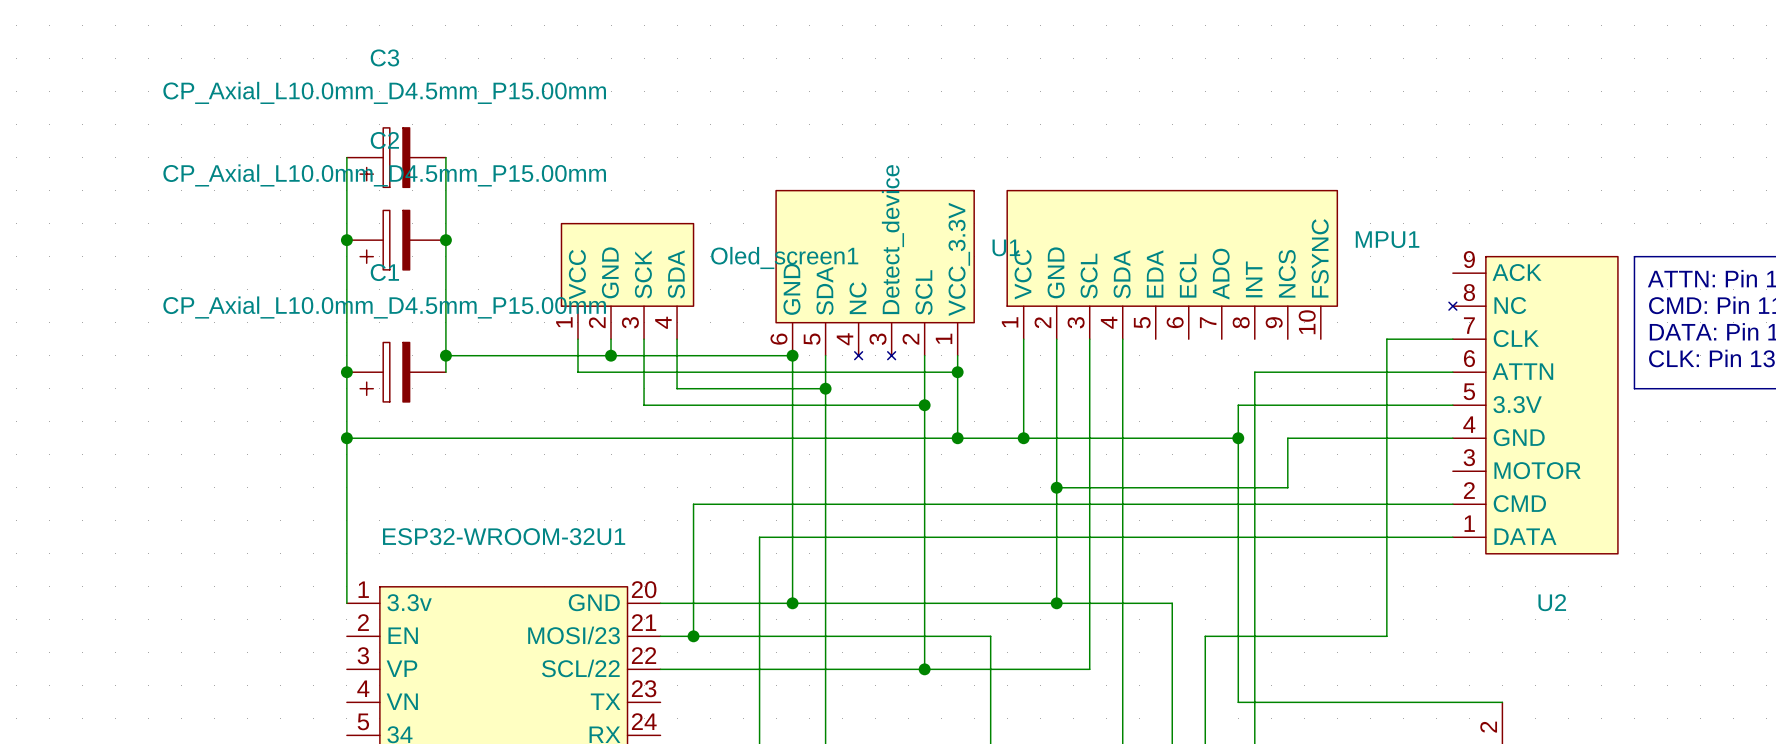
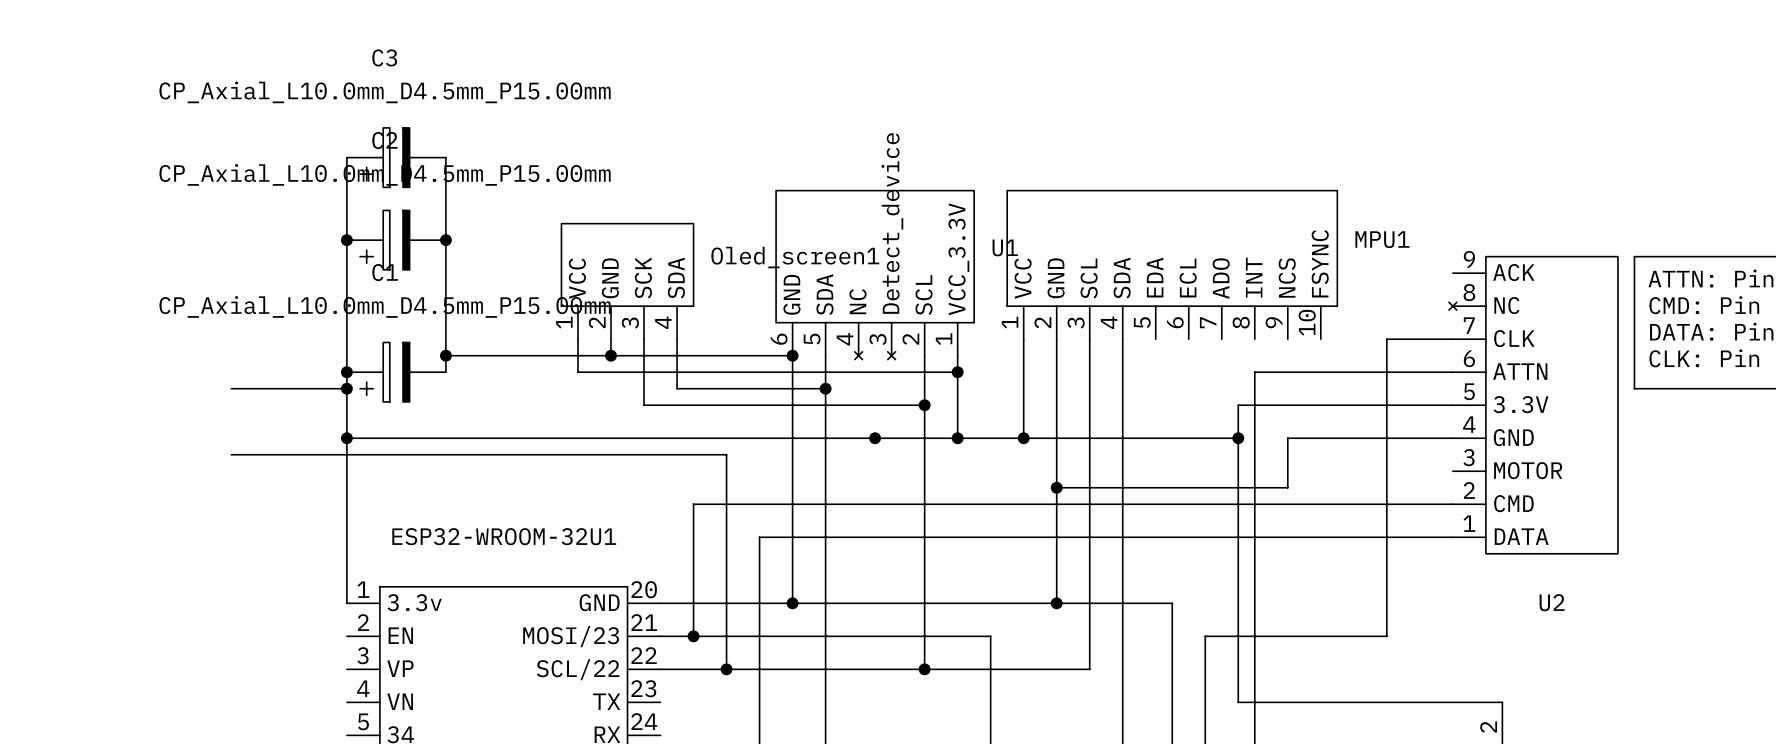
wire: none -> (231, 388) (346, 388)
junction: none -> (346, 388)
junction: none -> (875, 438)
wire: none -> (231, 454) (726, 454) (726, 669)
junction: none -> (726, 669)

